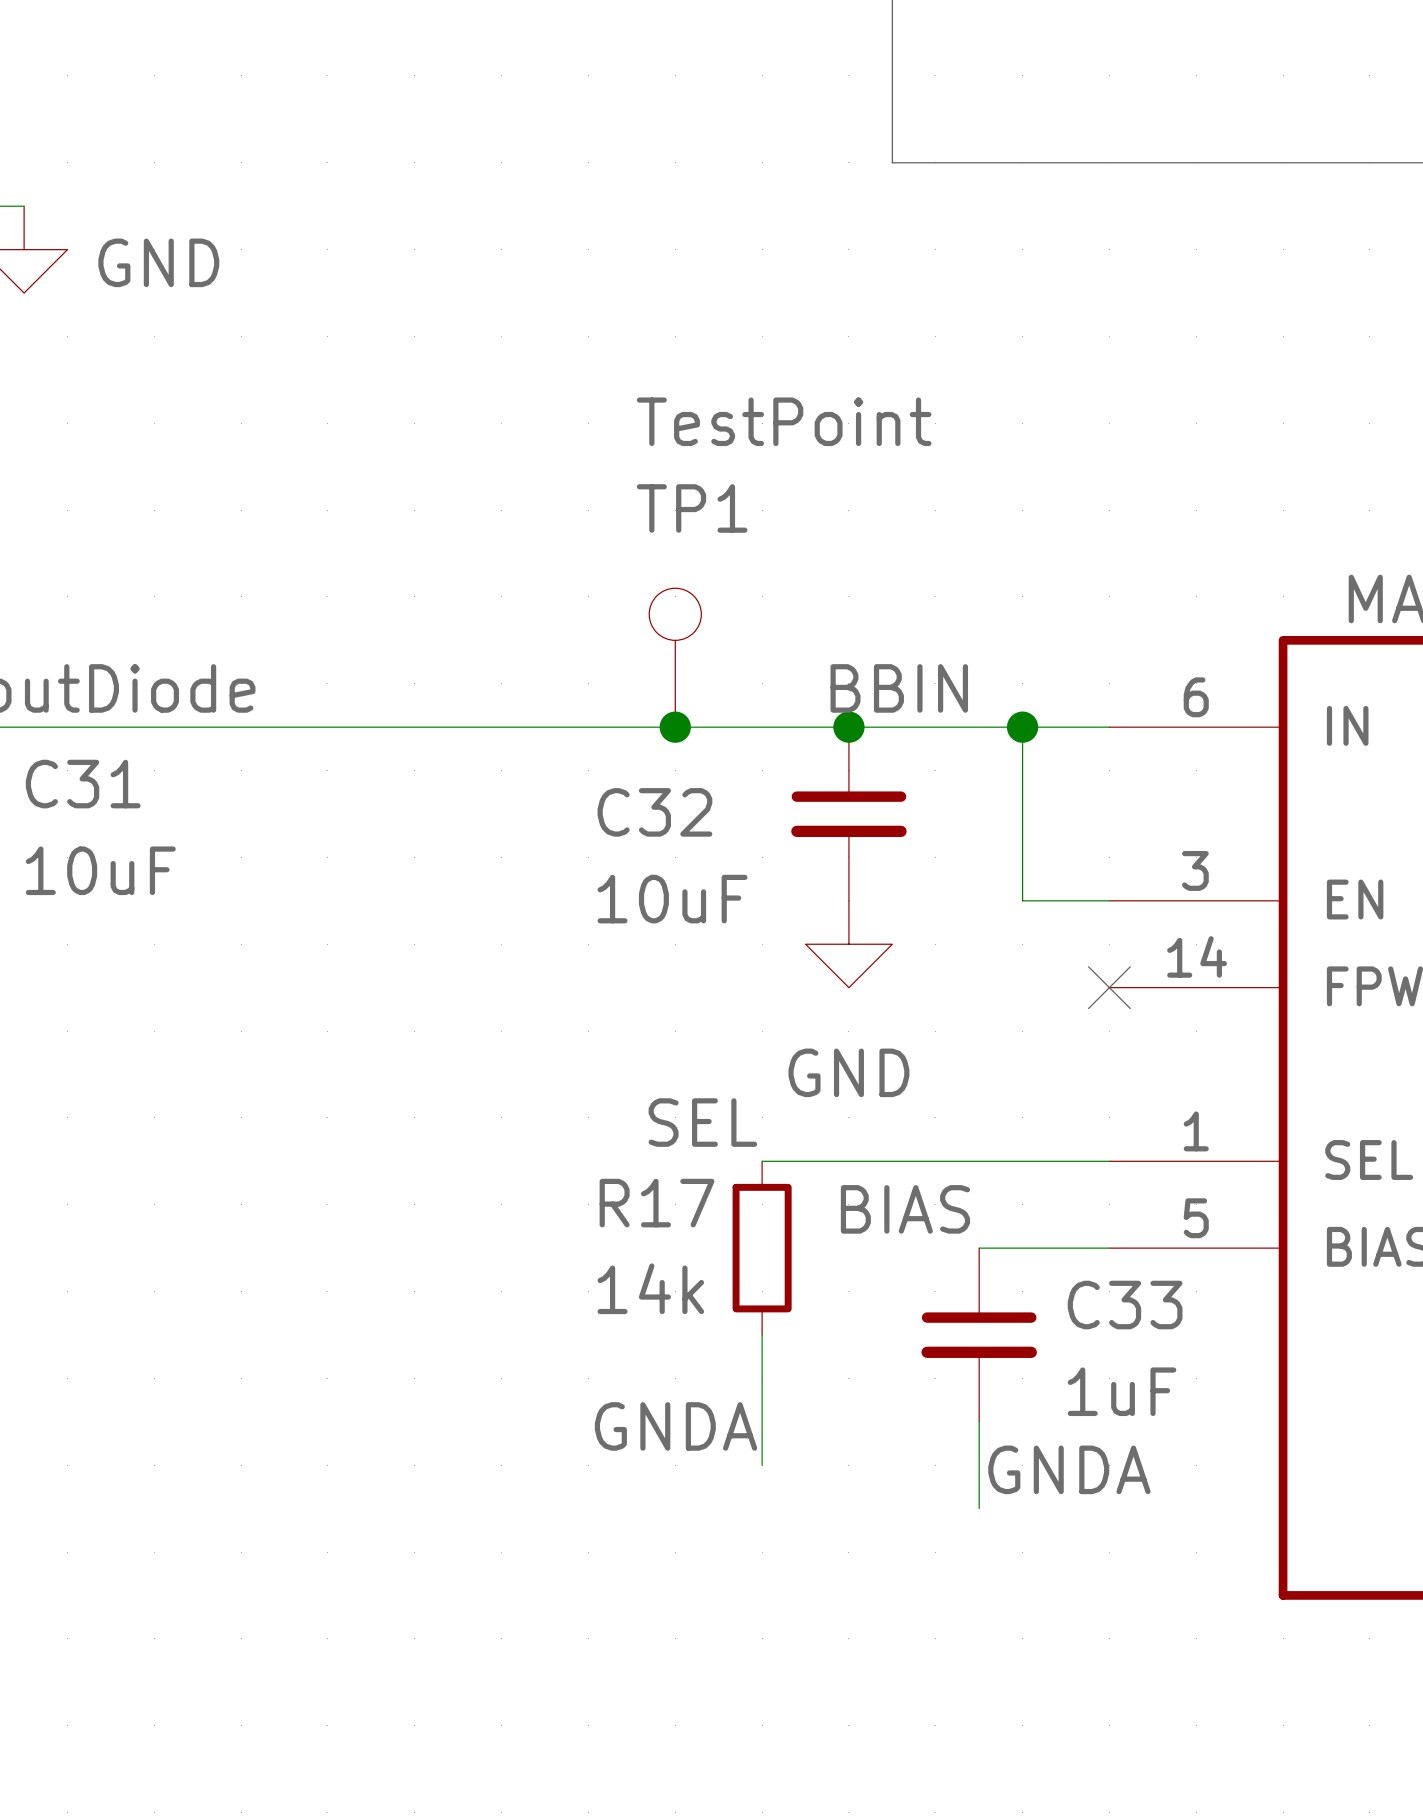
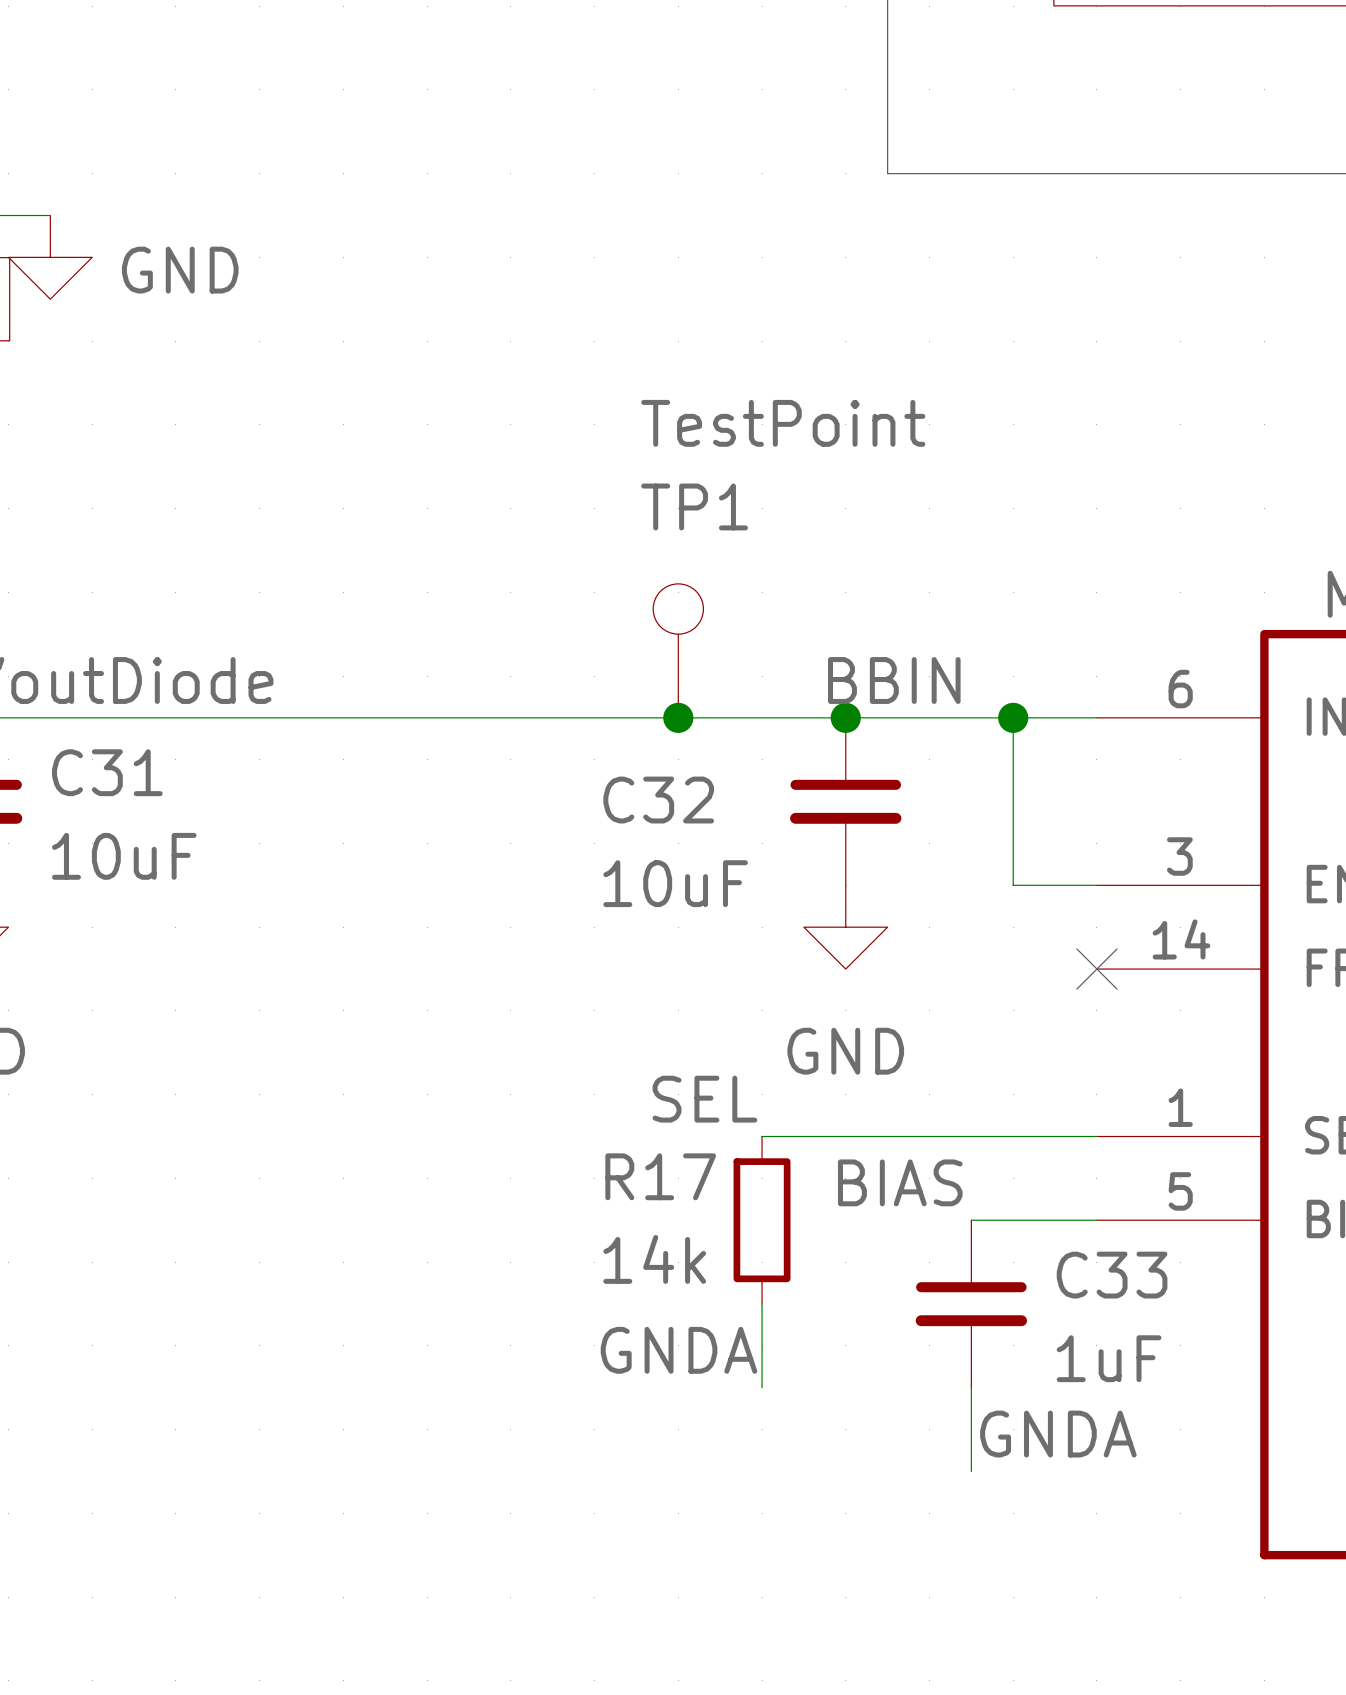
wire: (762, 1421) (762, 1465) -> none
label position: GNDA (676, 1426) -> GNDA (678, 1350)

